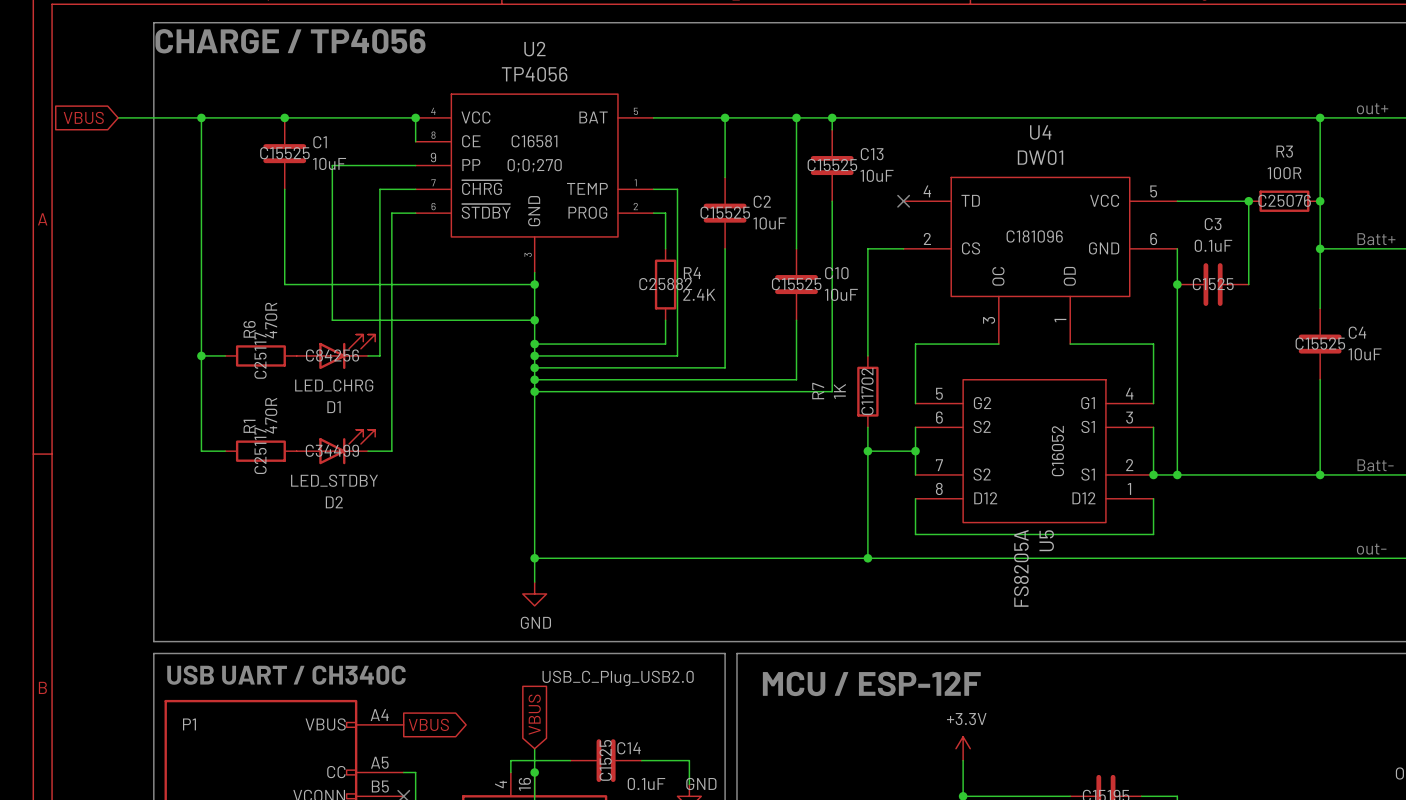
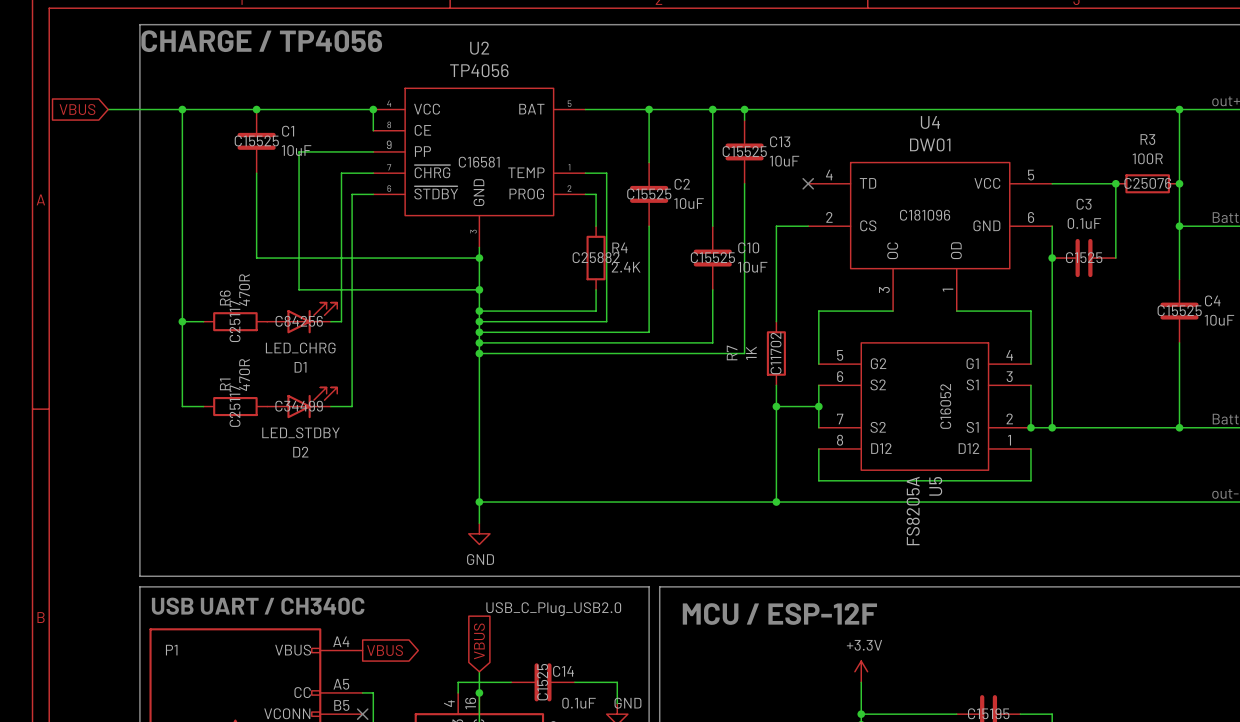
U2 text position: C16581 (534, 141) -> C16581 (479, 162)
U2 text: 0;0;270 (534, 165) -> none

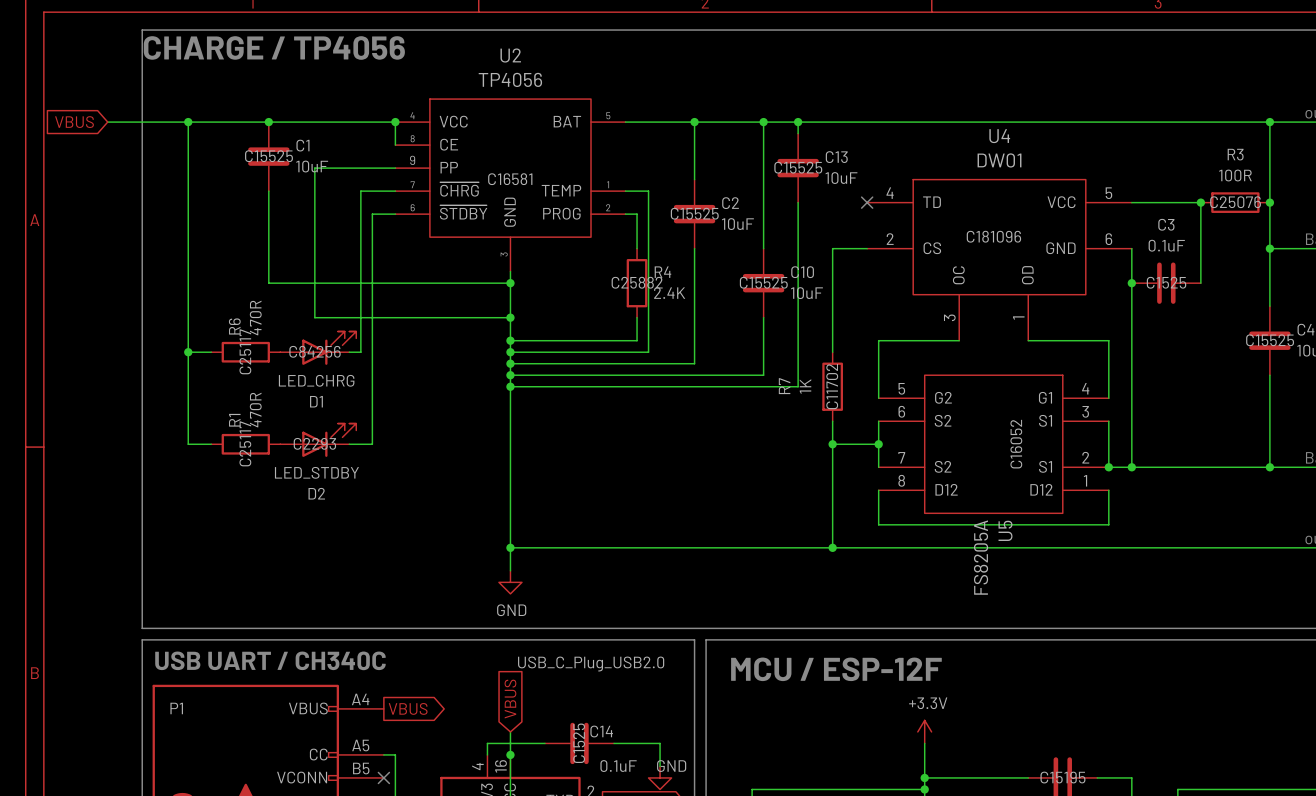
D2 text: C34499 (299, 406) -> C2293 (314, 443)

